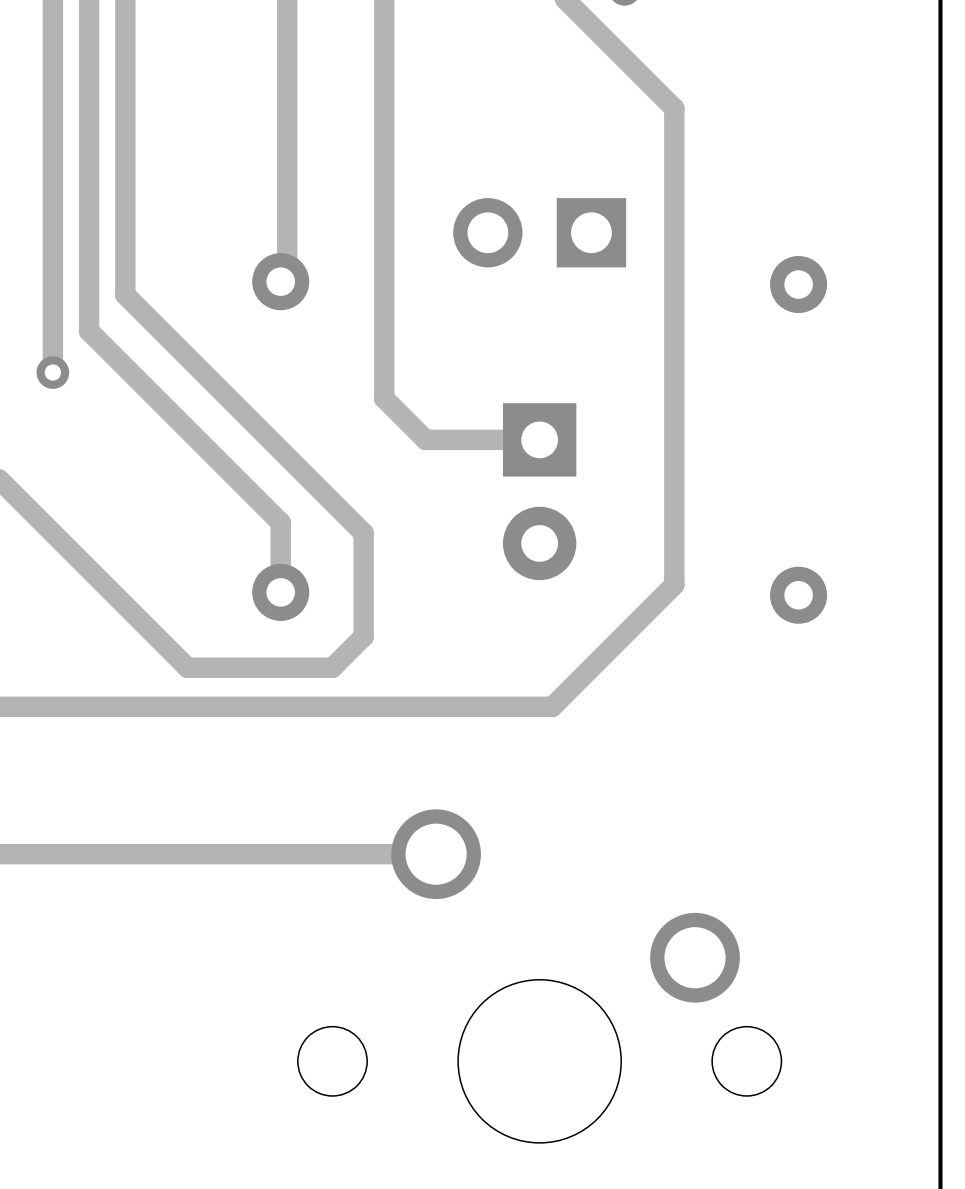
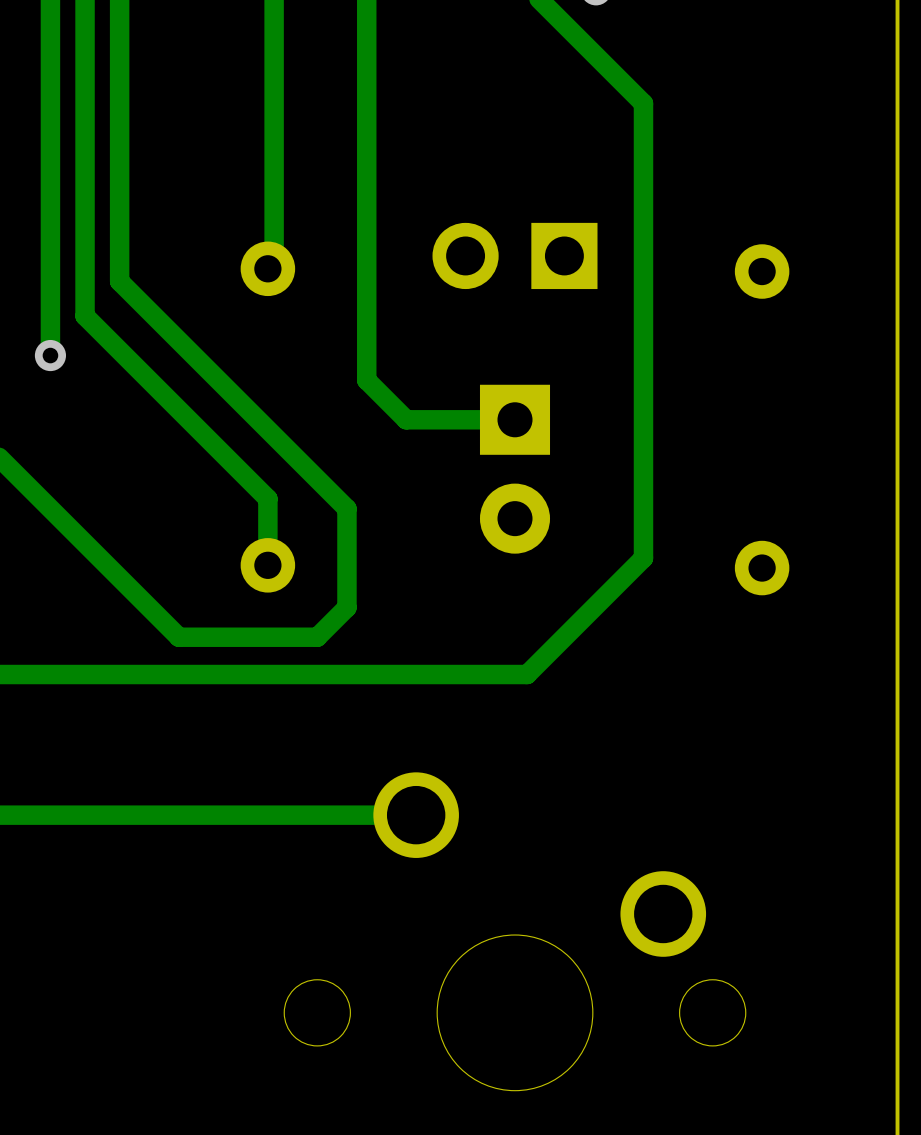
part position: (539, 232) -> (515, 255)

